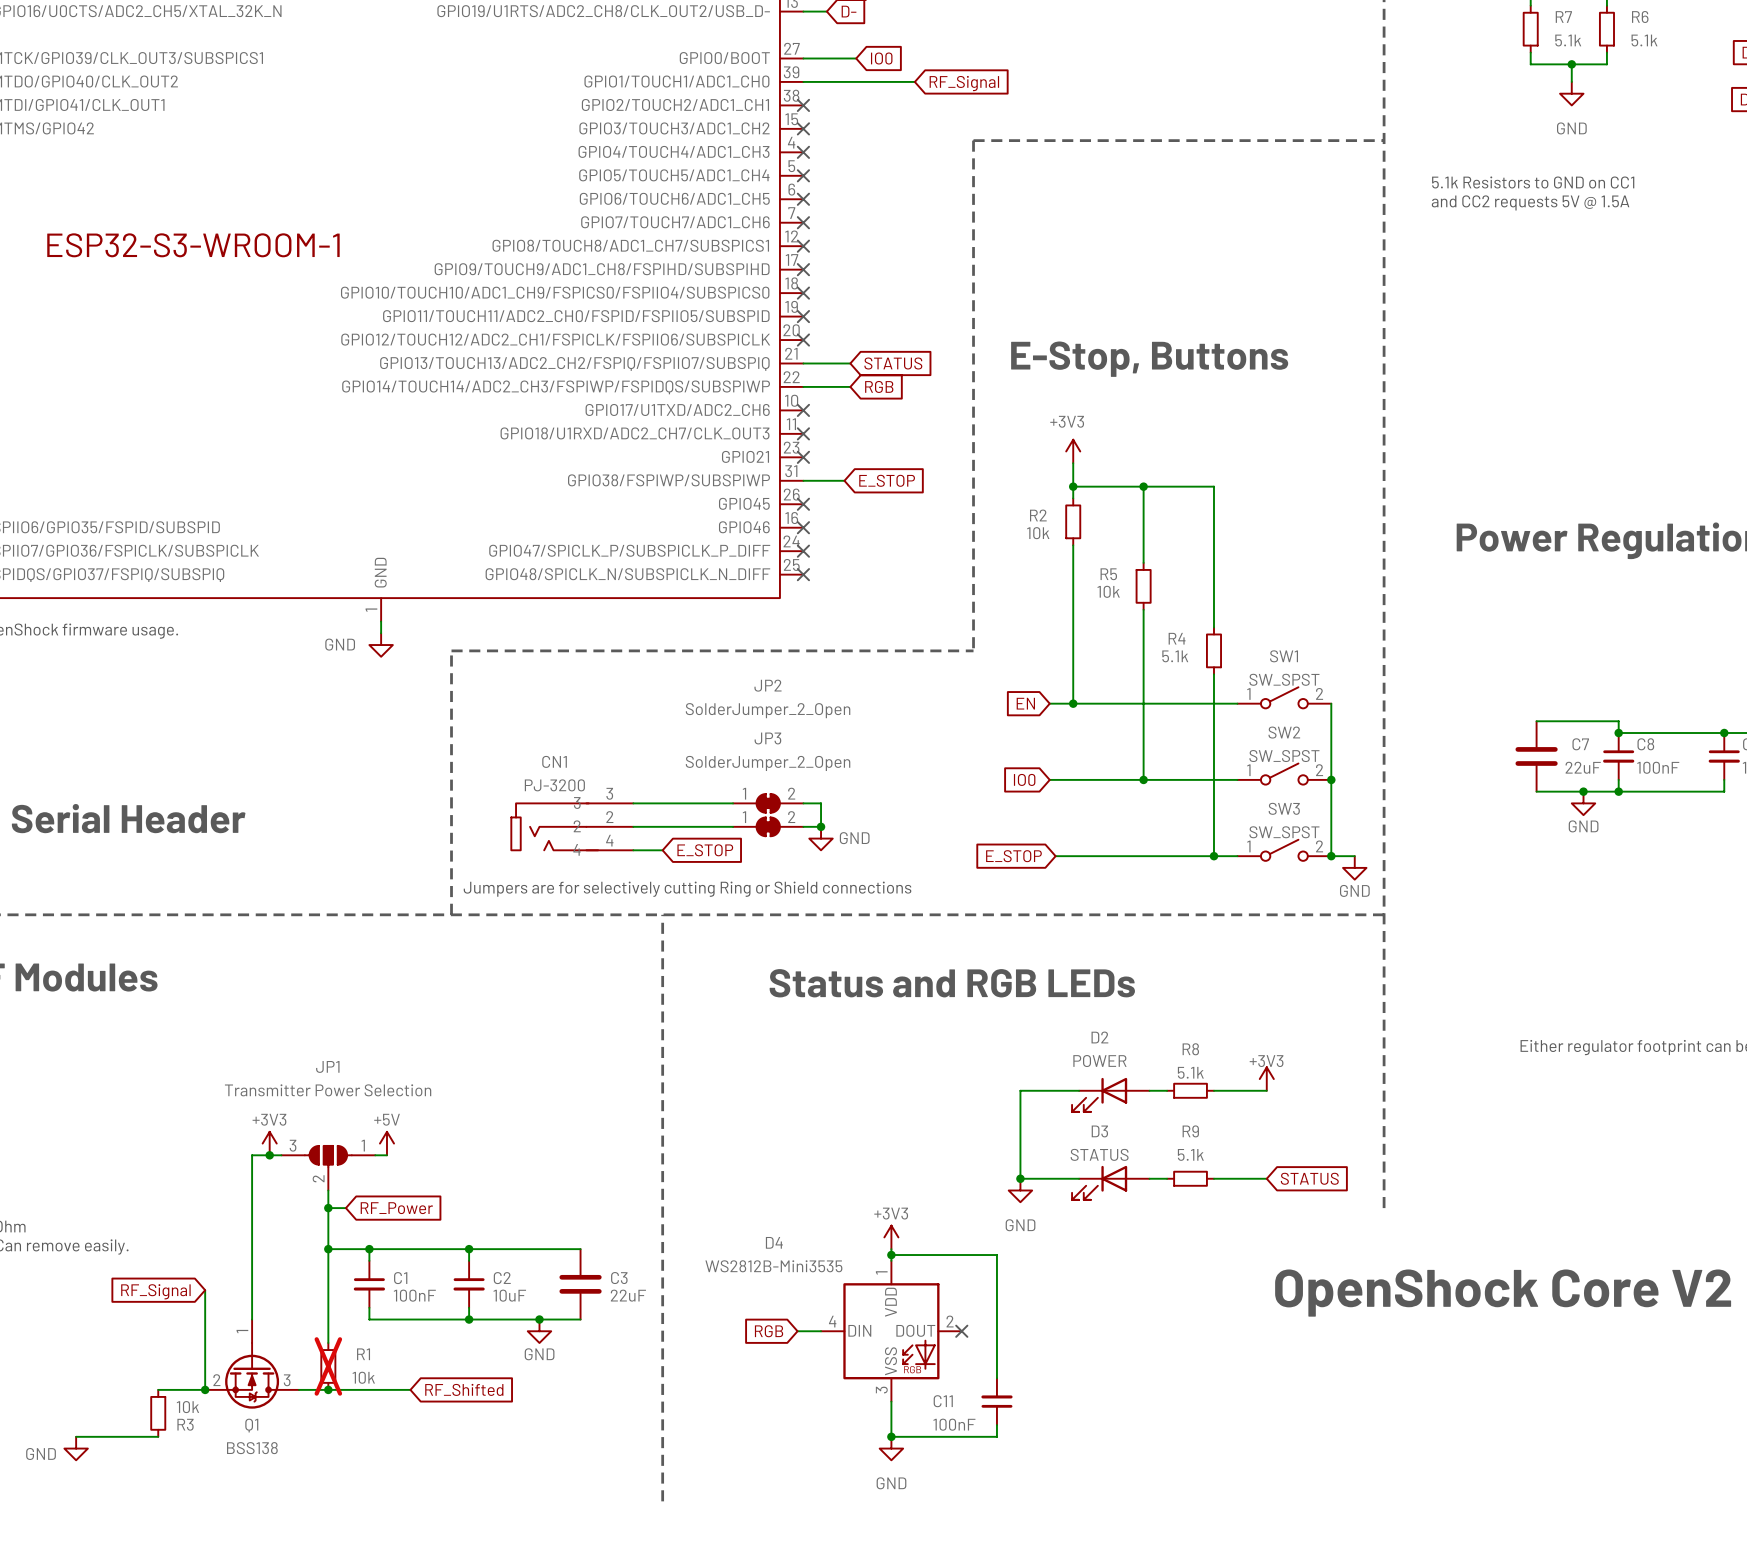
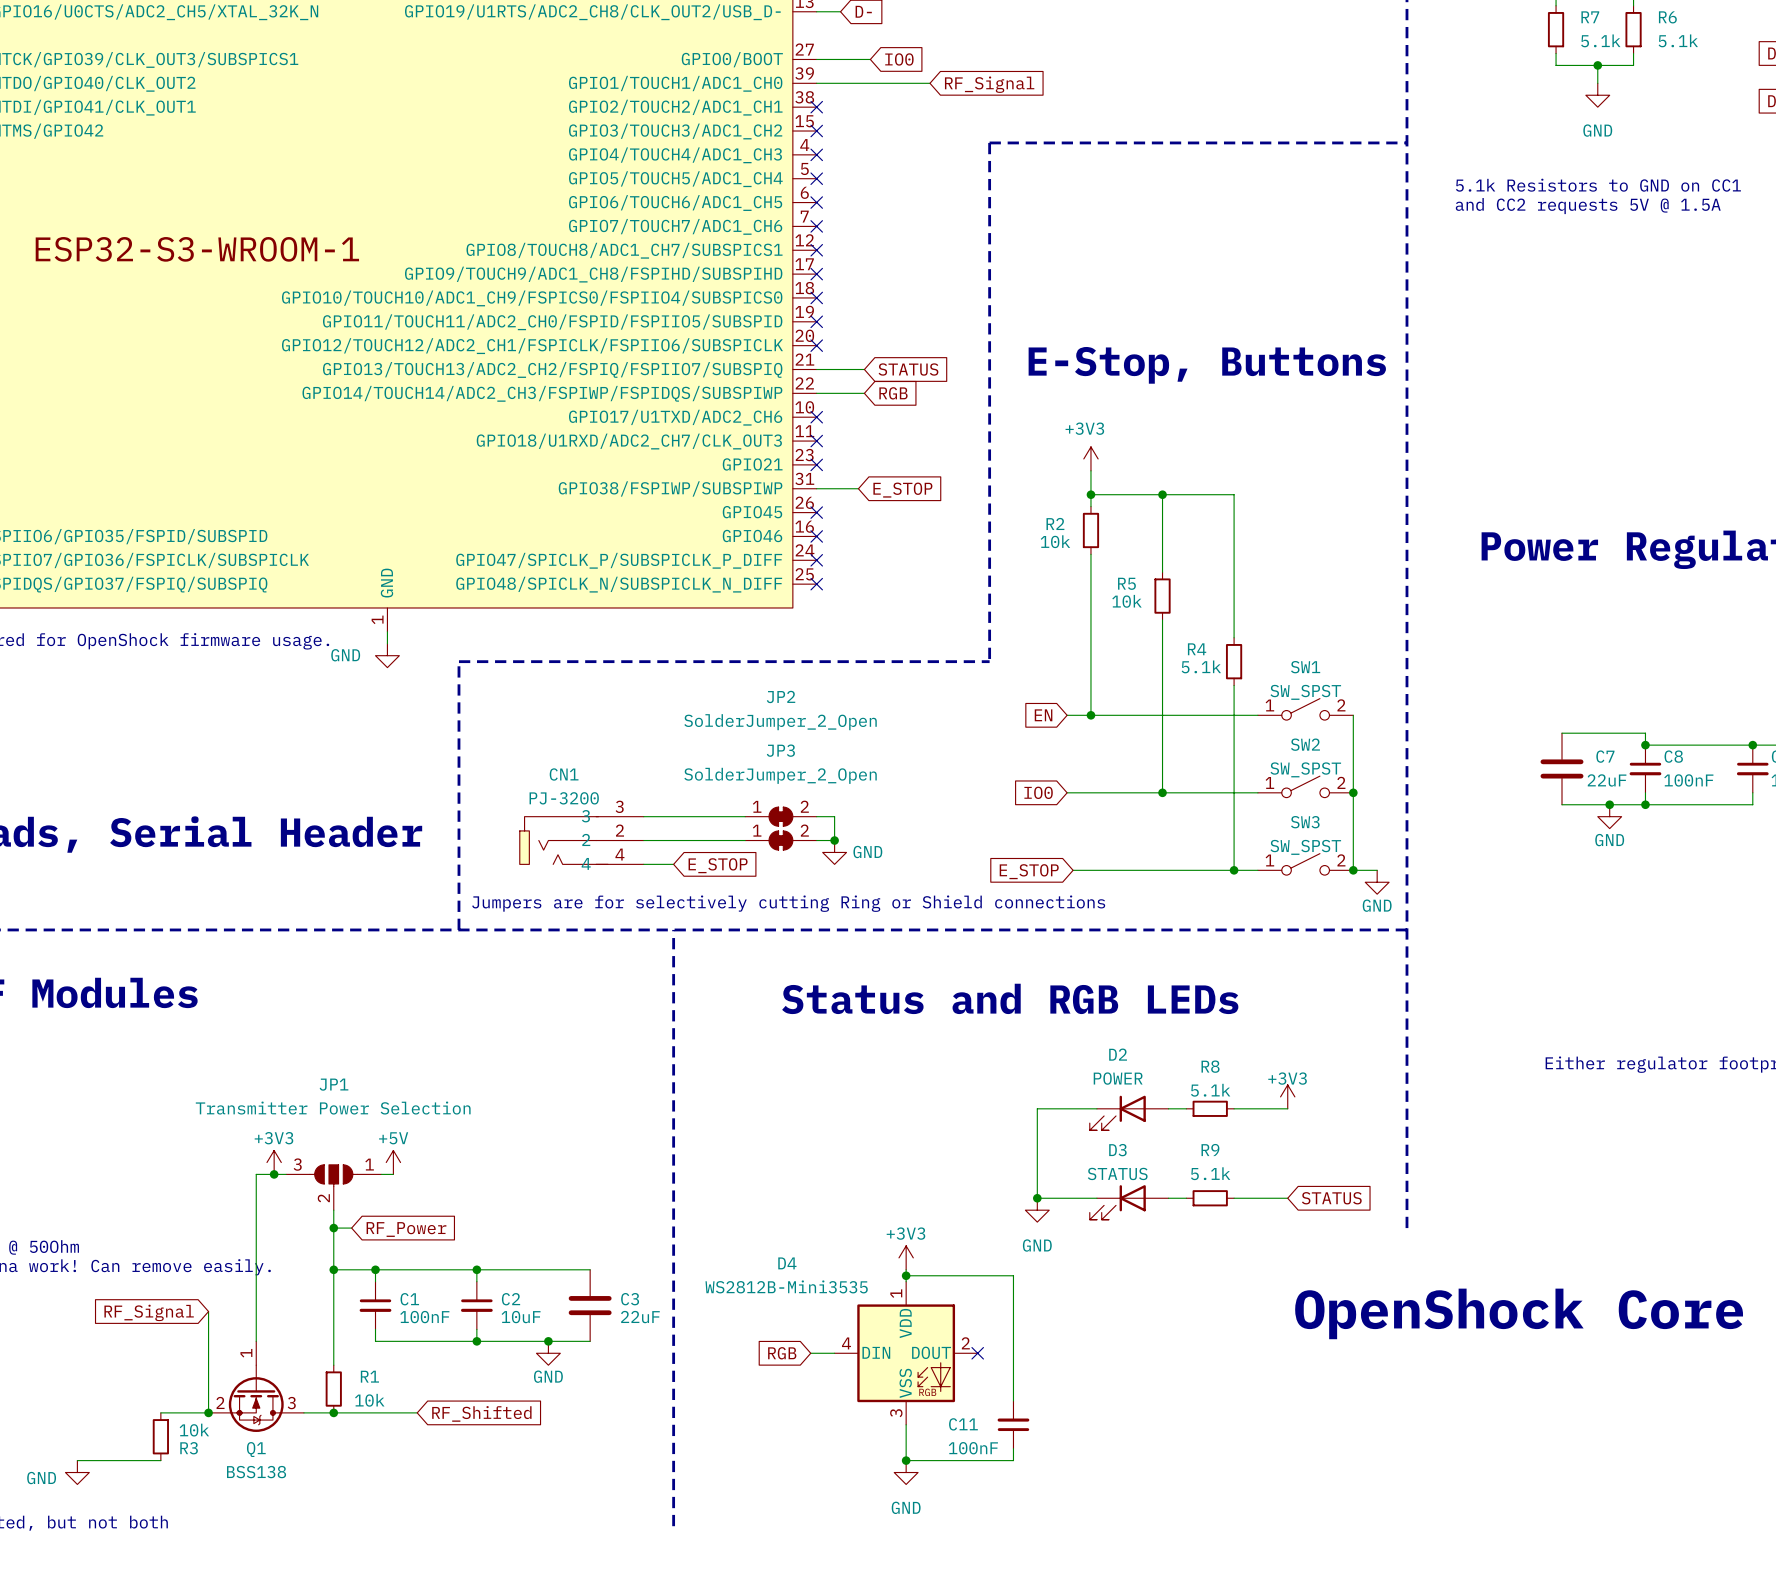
R1 do-not-place cross: (328, 1366) -> none

